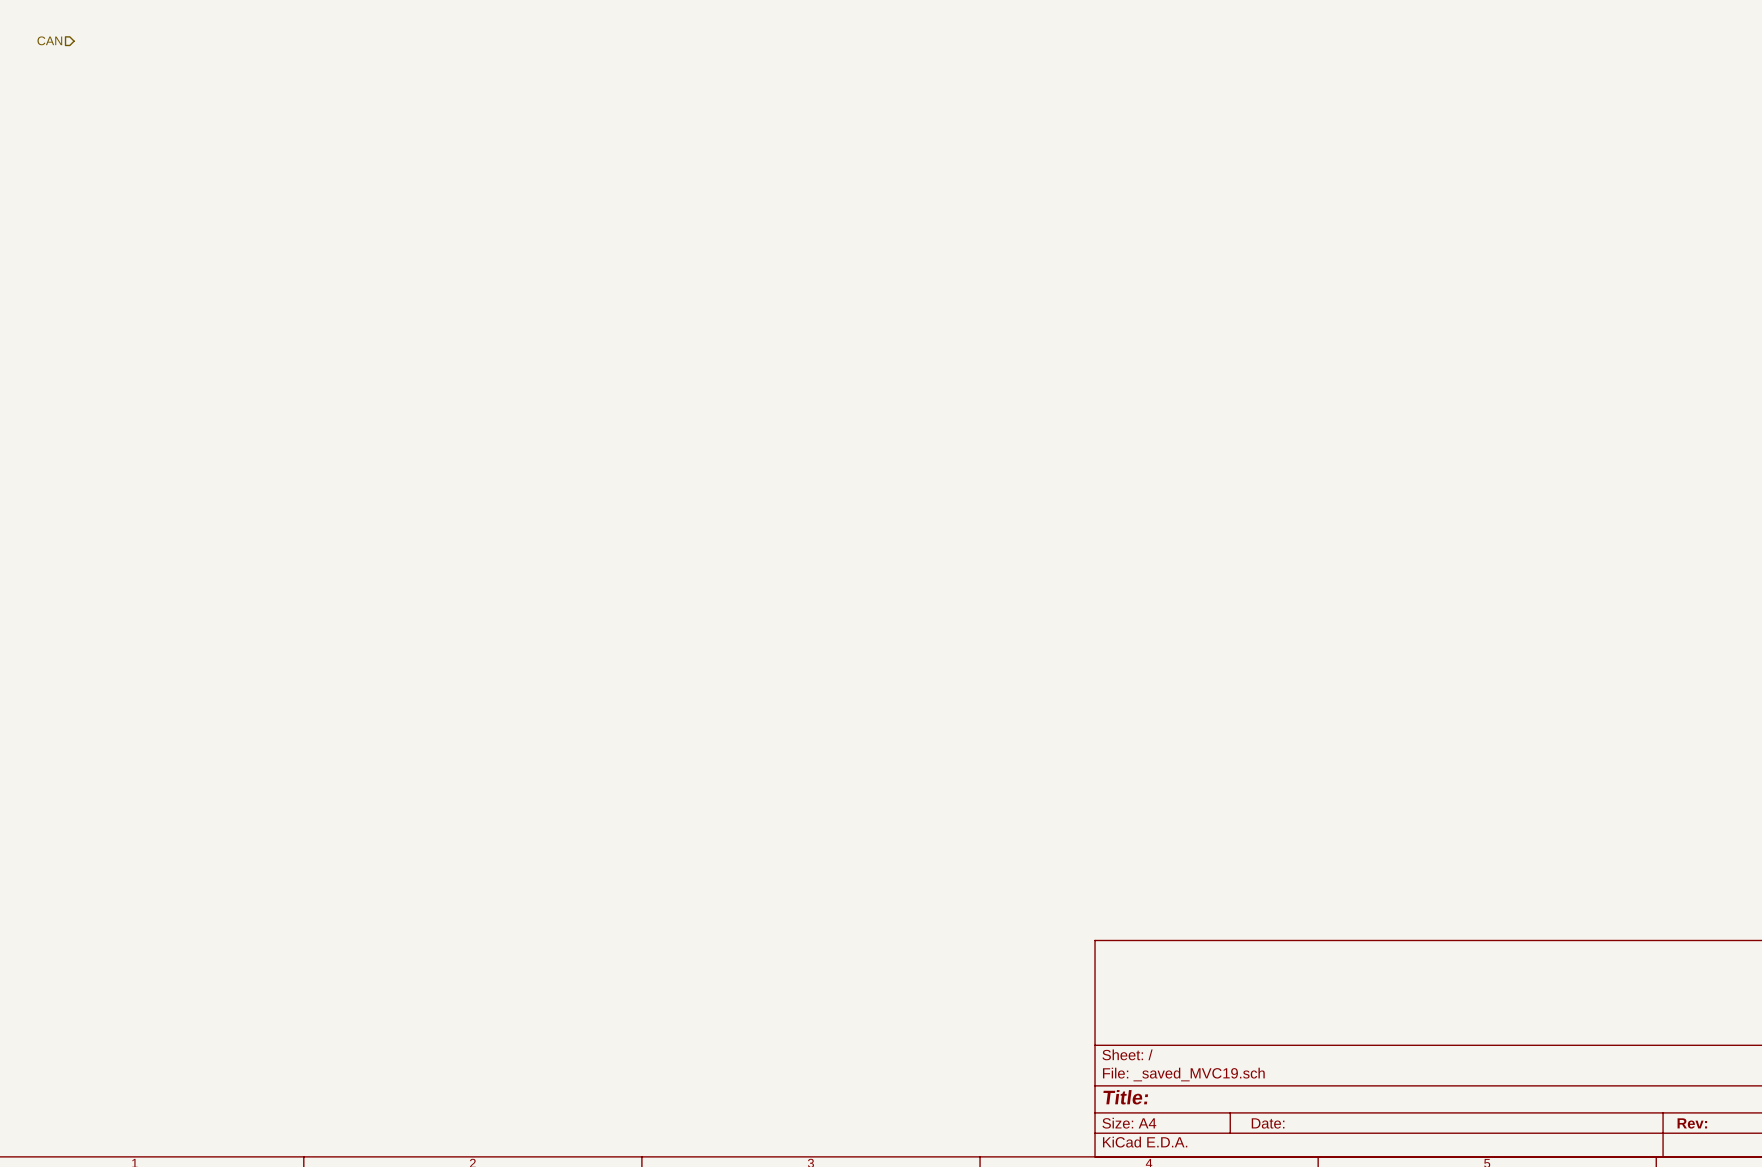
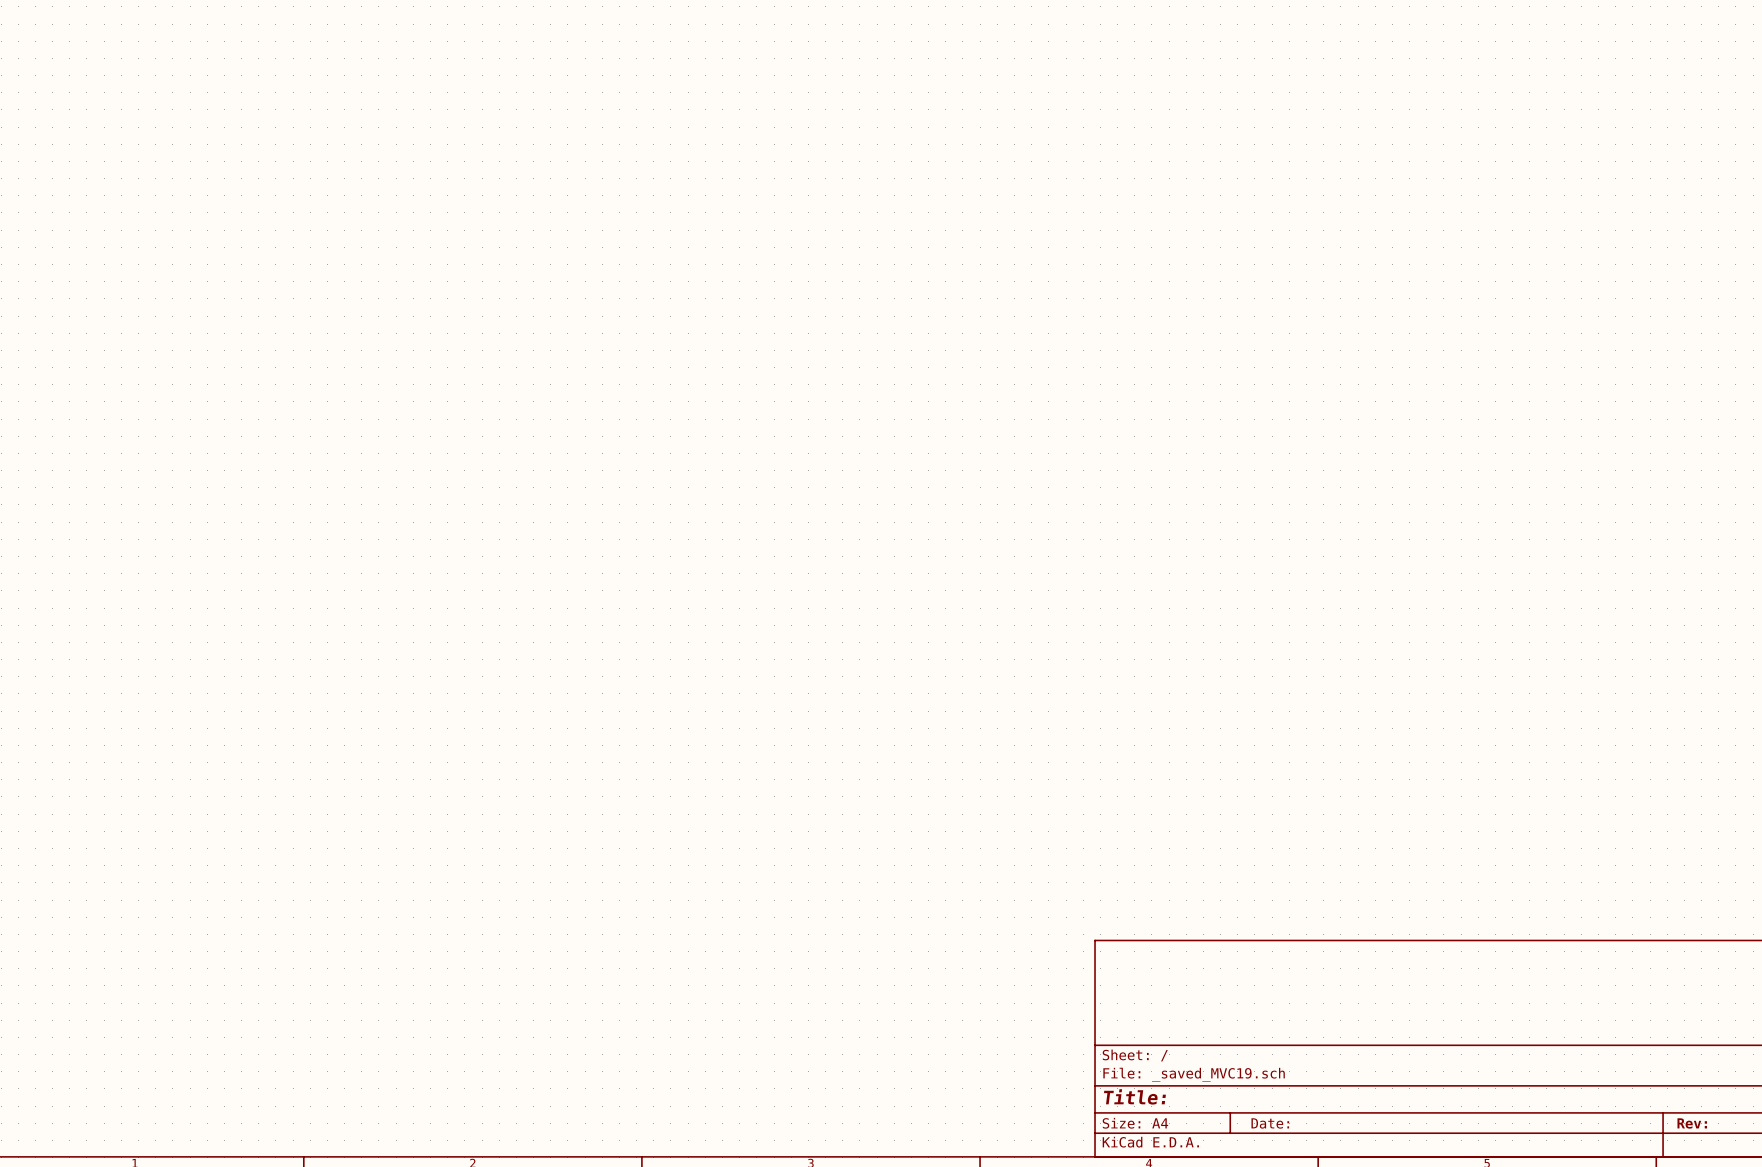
hierarchical label: CAN (49, 40) -> none

